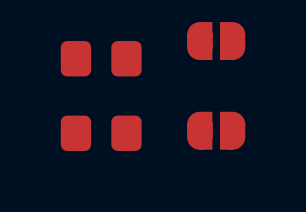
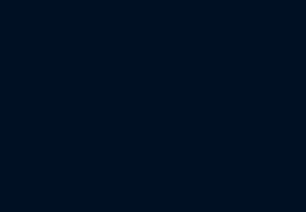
part: (216, 41) -> none
part: (101, 58) -> none
part: (216, 130) -> none
part: (101, 133) -> none

